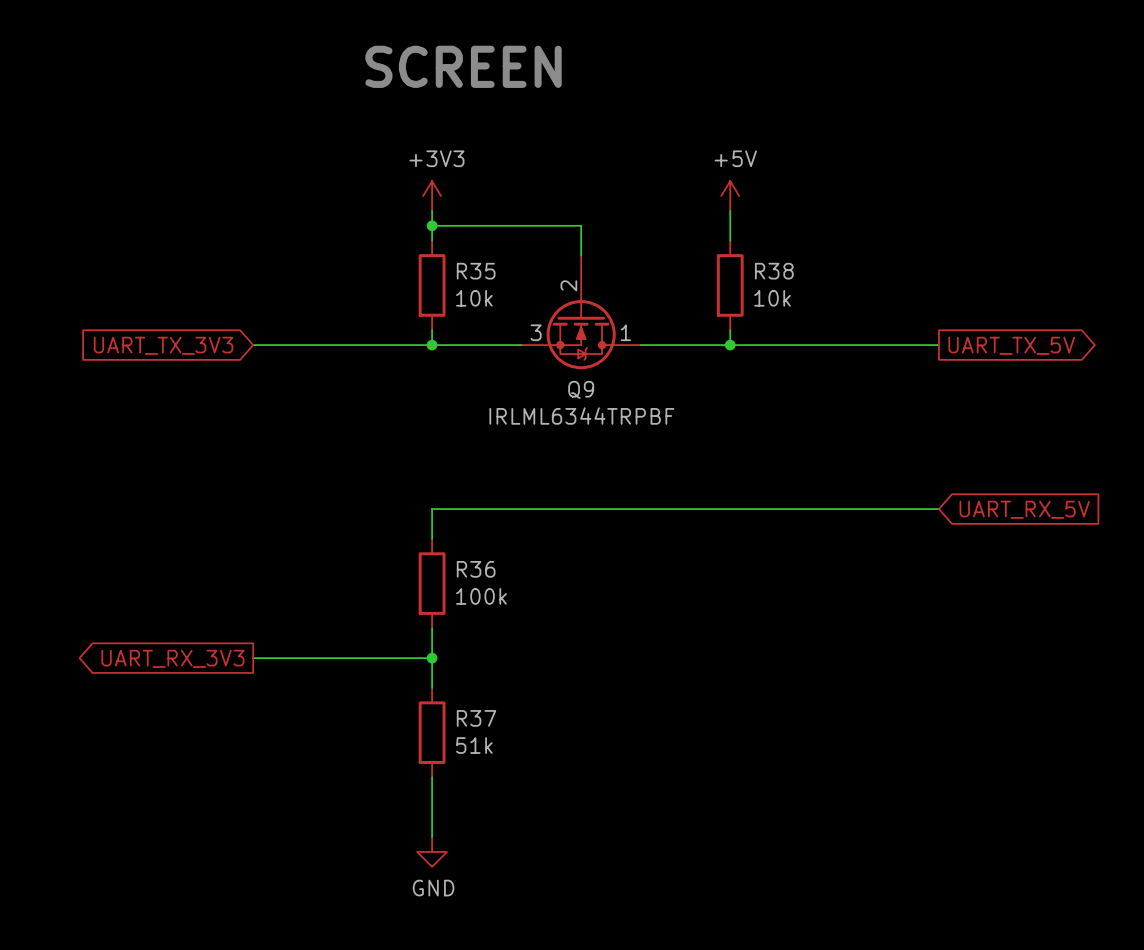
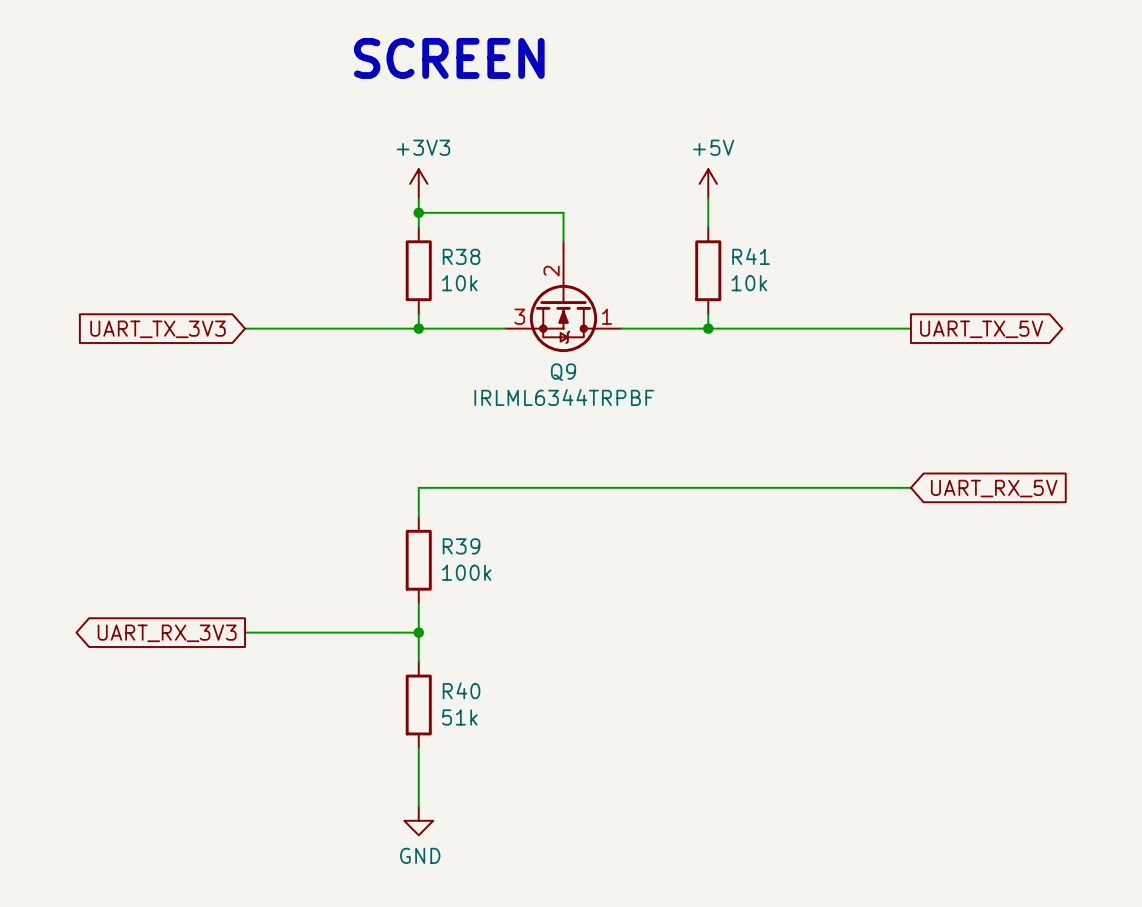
R35 name: R35 (476, 271) -> R38 (461, 256)
R38 name: R38 (774, 271) -> R41 (751, 256)
R36 name: R36 (476, 569) -> R39 (461, 546)
R37 name: R37 (476, 718) -> R40 (461, 690)

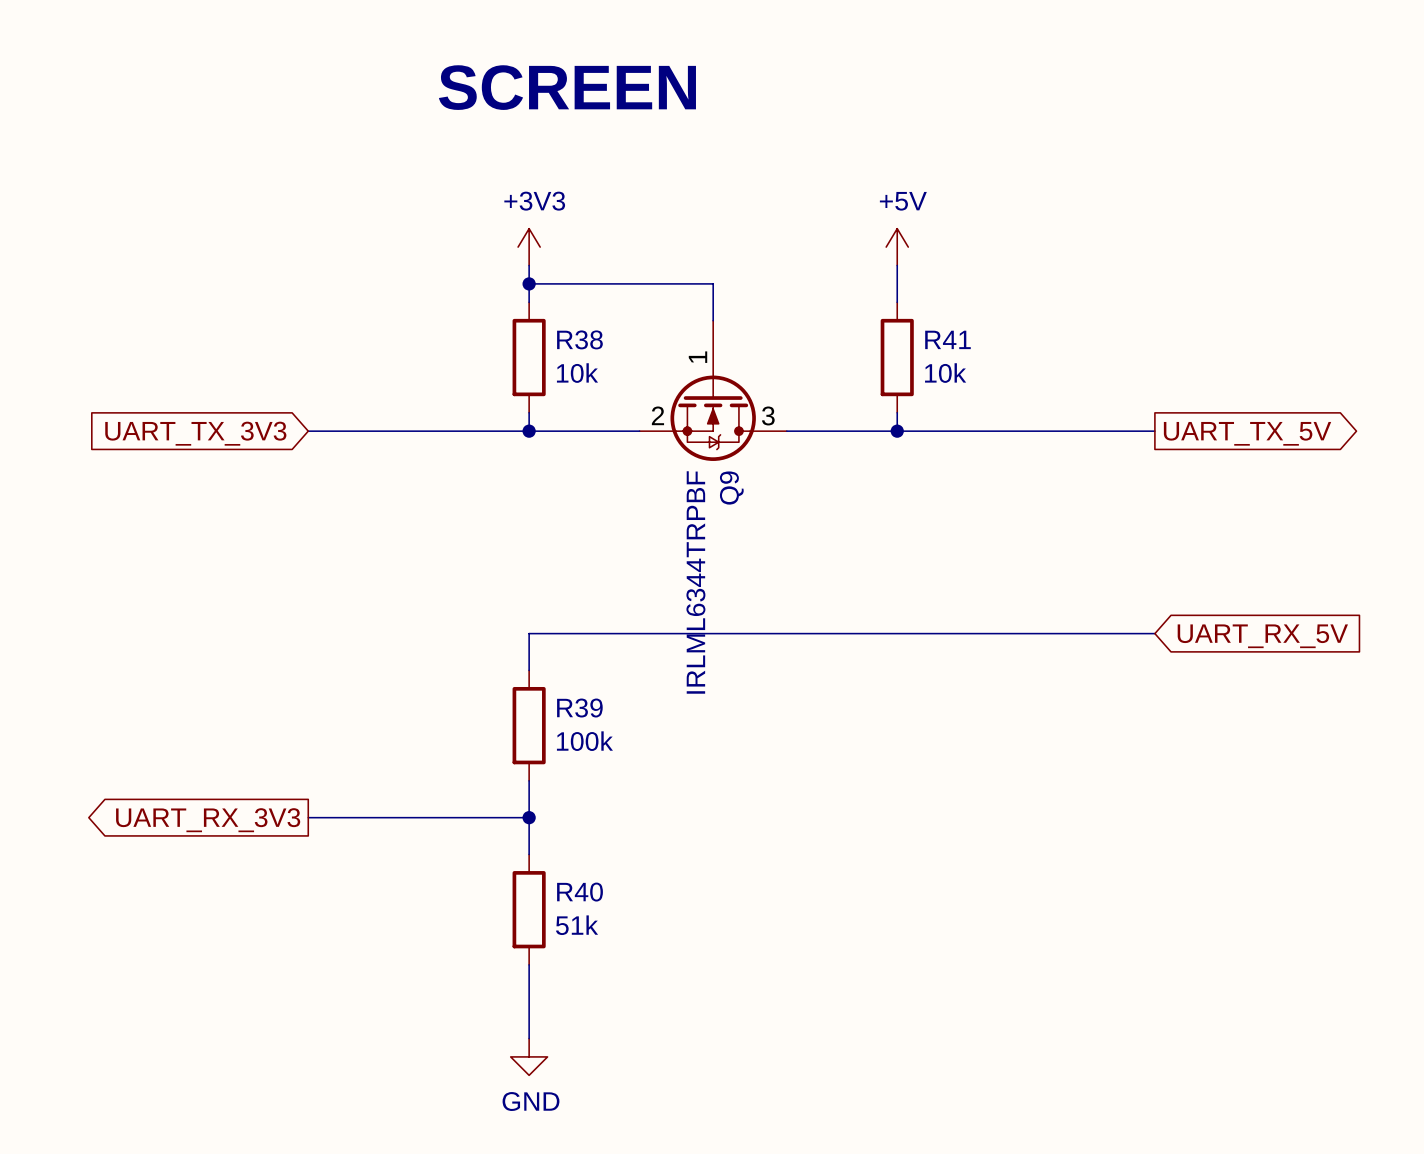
Q9 pin number: 2 (551, 271) -> 1 (698, 357)
Q9 pin number: 3 (519, 316) -> 2 (657, 415)
Q9 pin number: 1 (606, 316) -> 3 (768, 415)
Q9 name rotation: 0° (563, 372) -> 90° counterclockwise (731, 488)
Q9 value rotation: 0° (564, 397) -> 90° counterclockwise (695, 582)

